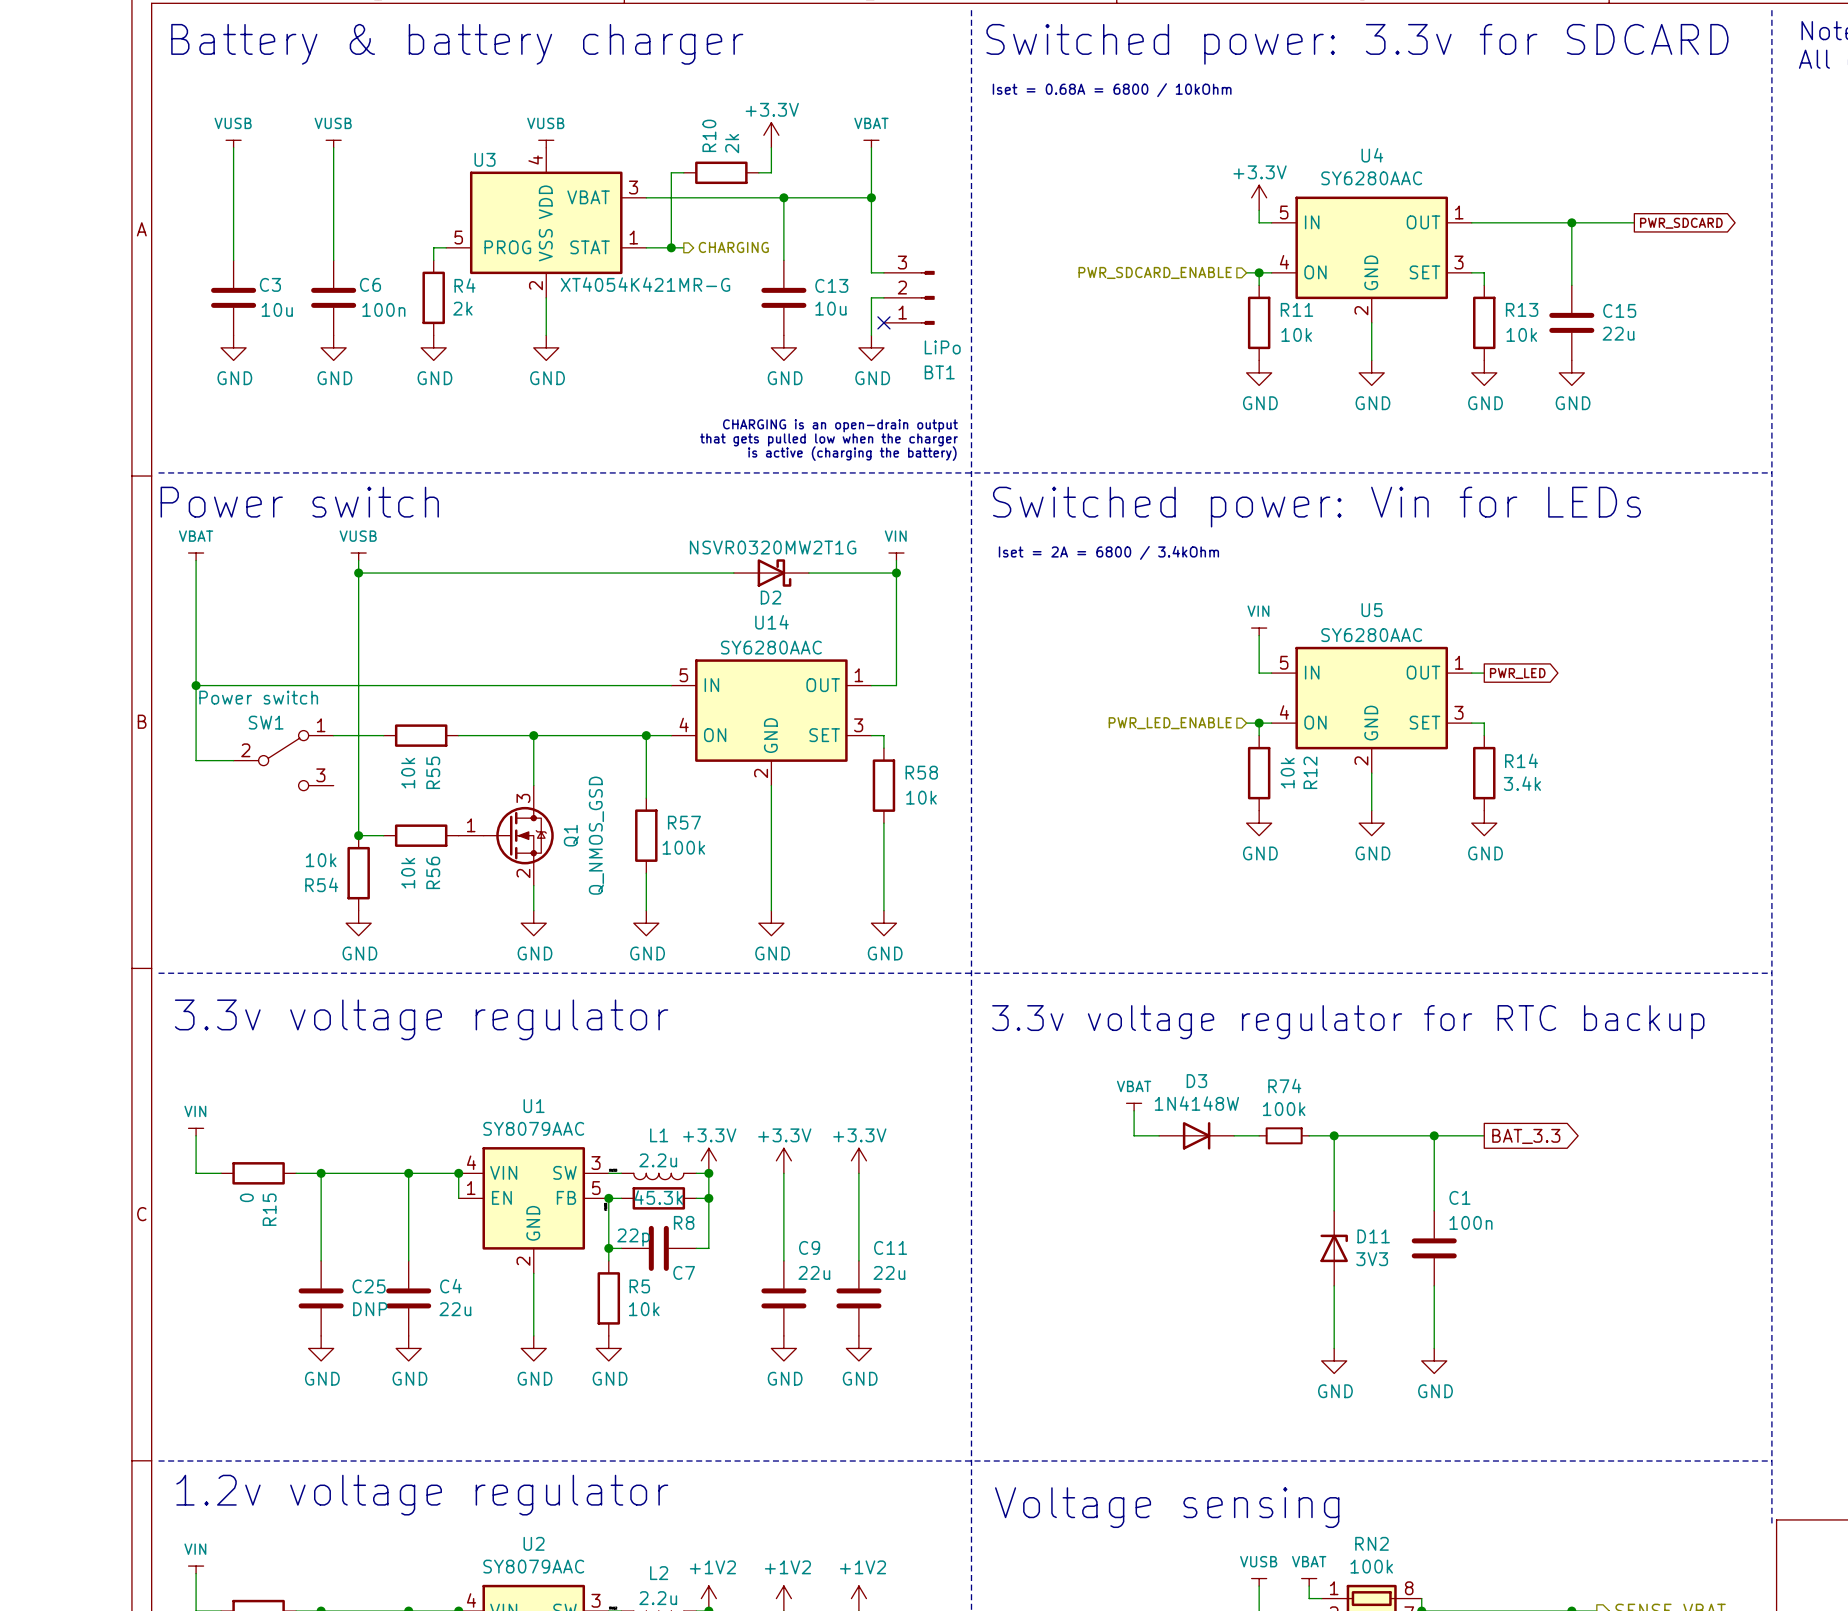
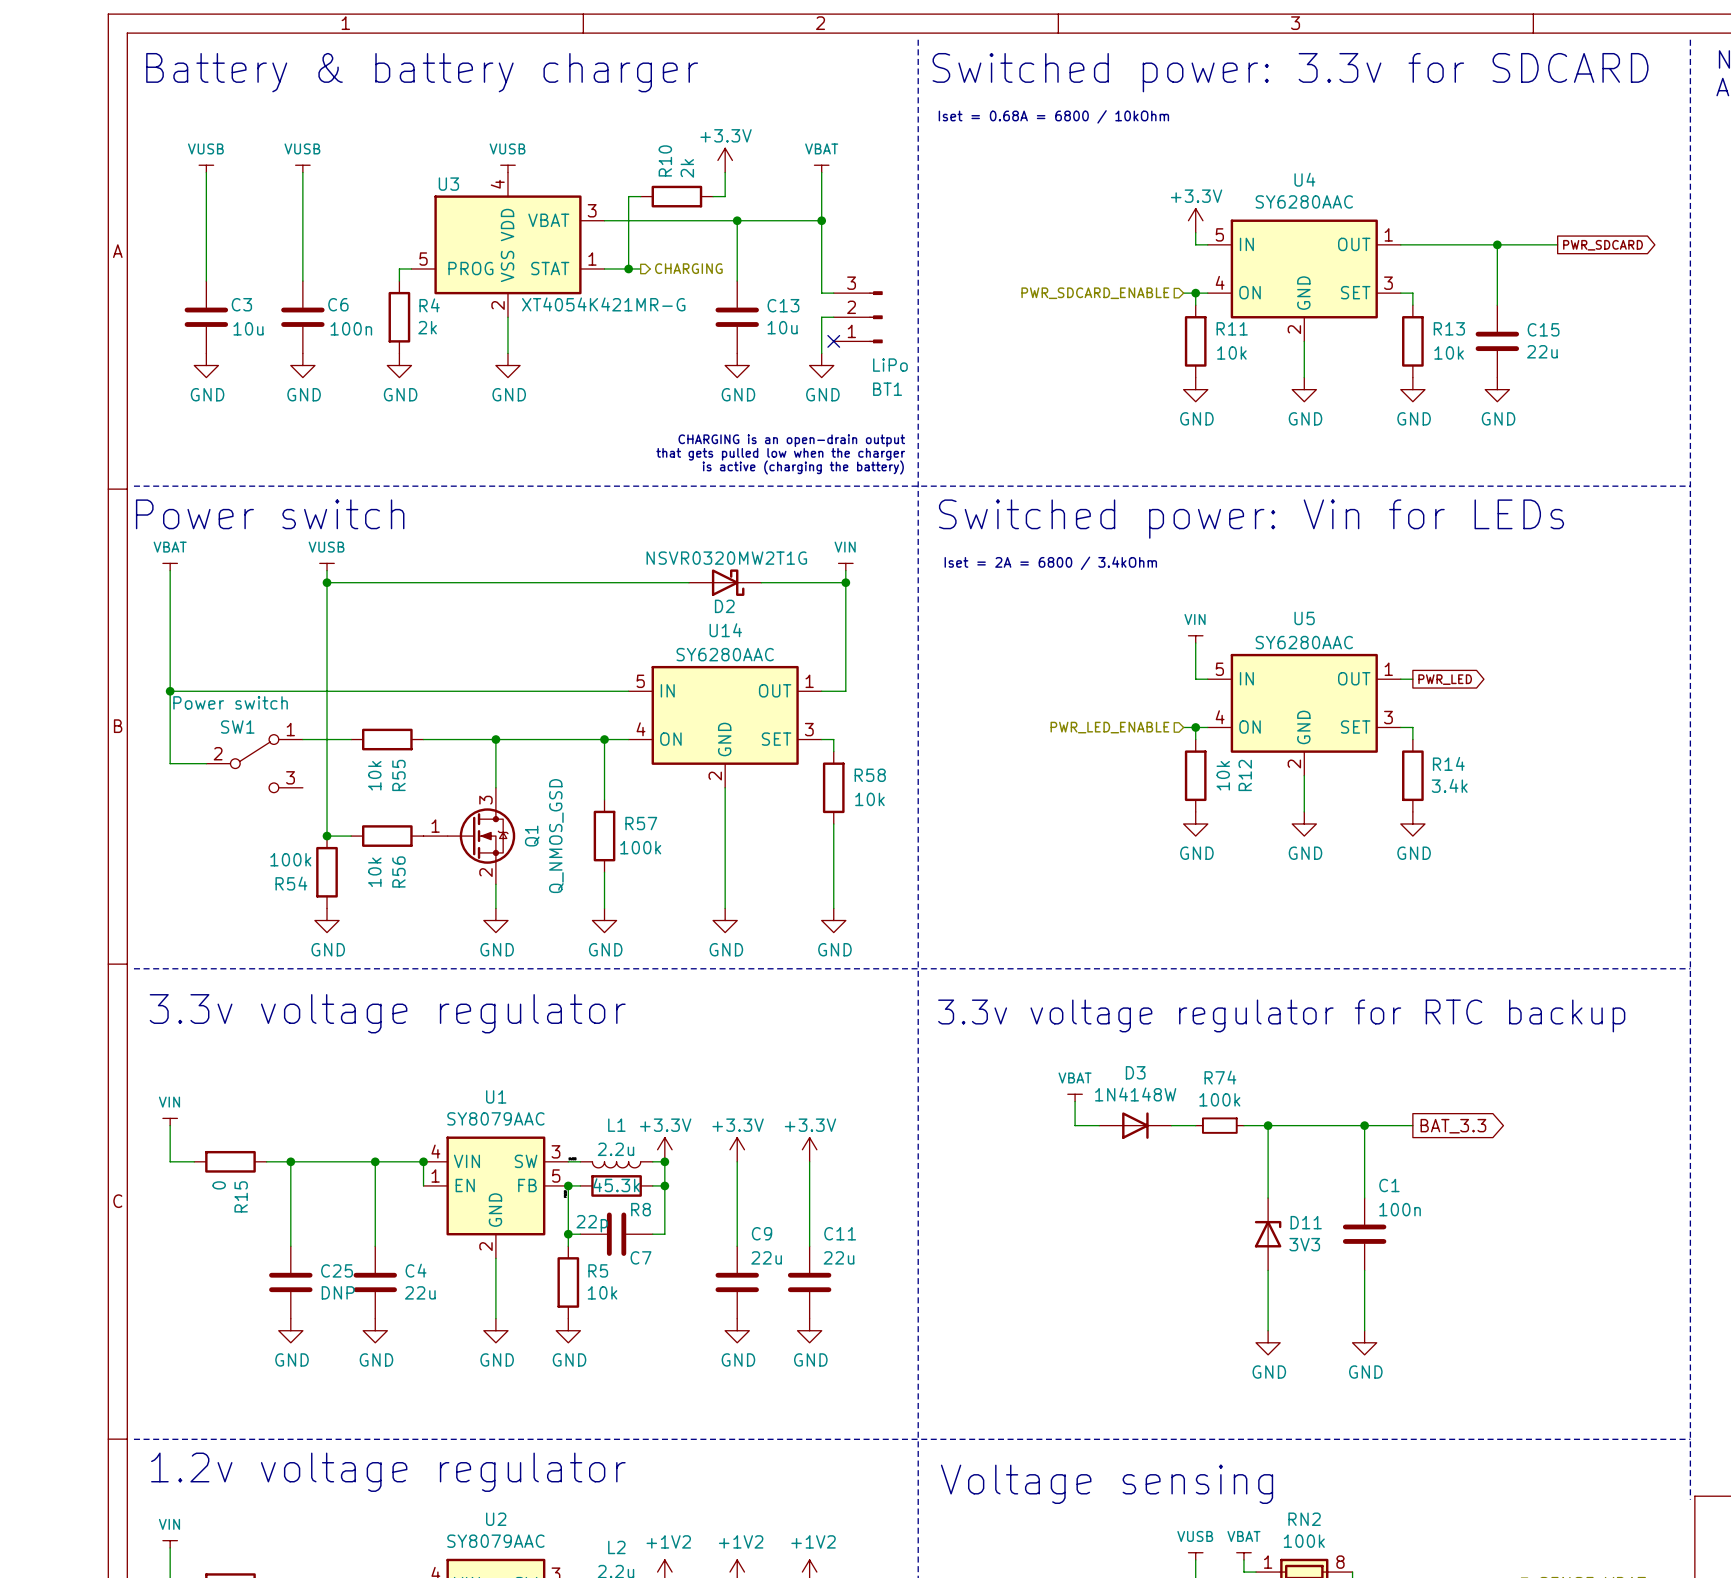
R54 value: 10k (321, 860) -> 100k (290, 859)

